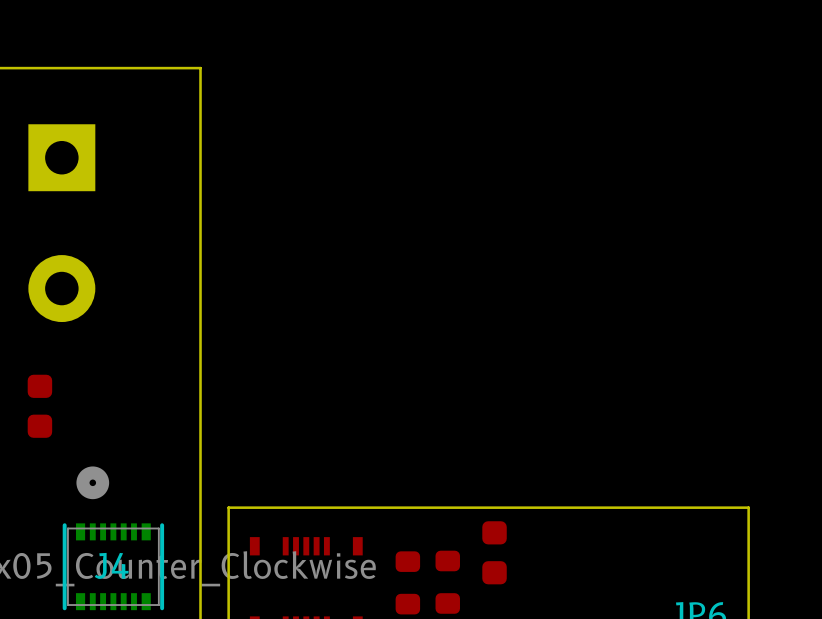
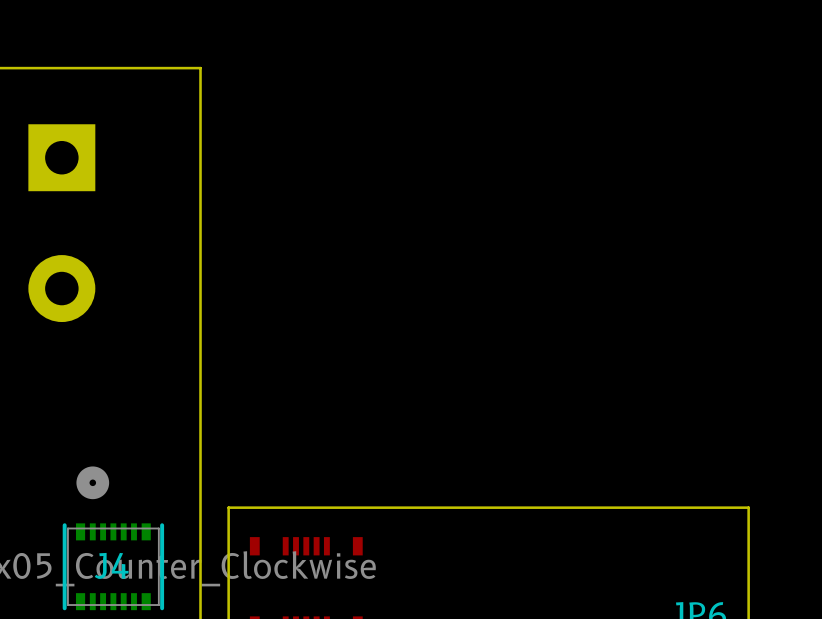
part: (39, 406) -> none
part: (494, 552) -> none
part: (407, 582) -> none
part: (447, 582) -> none

